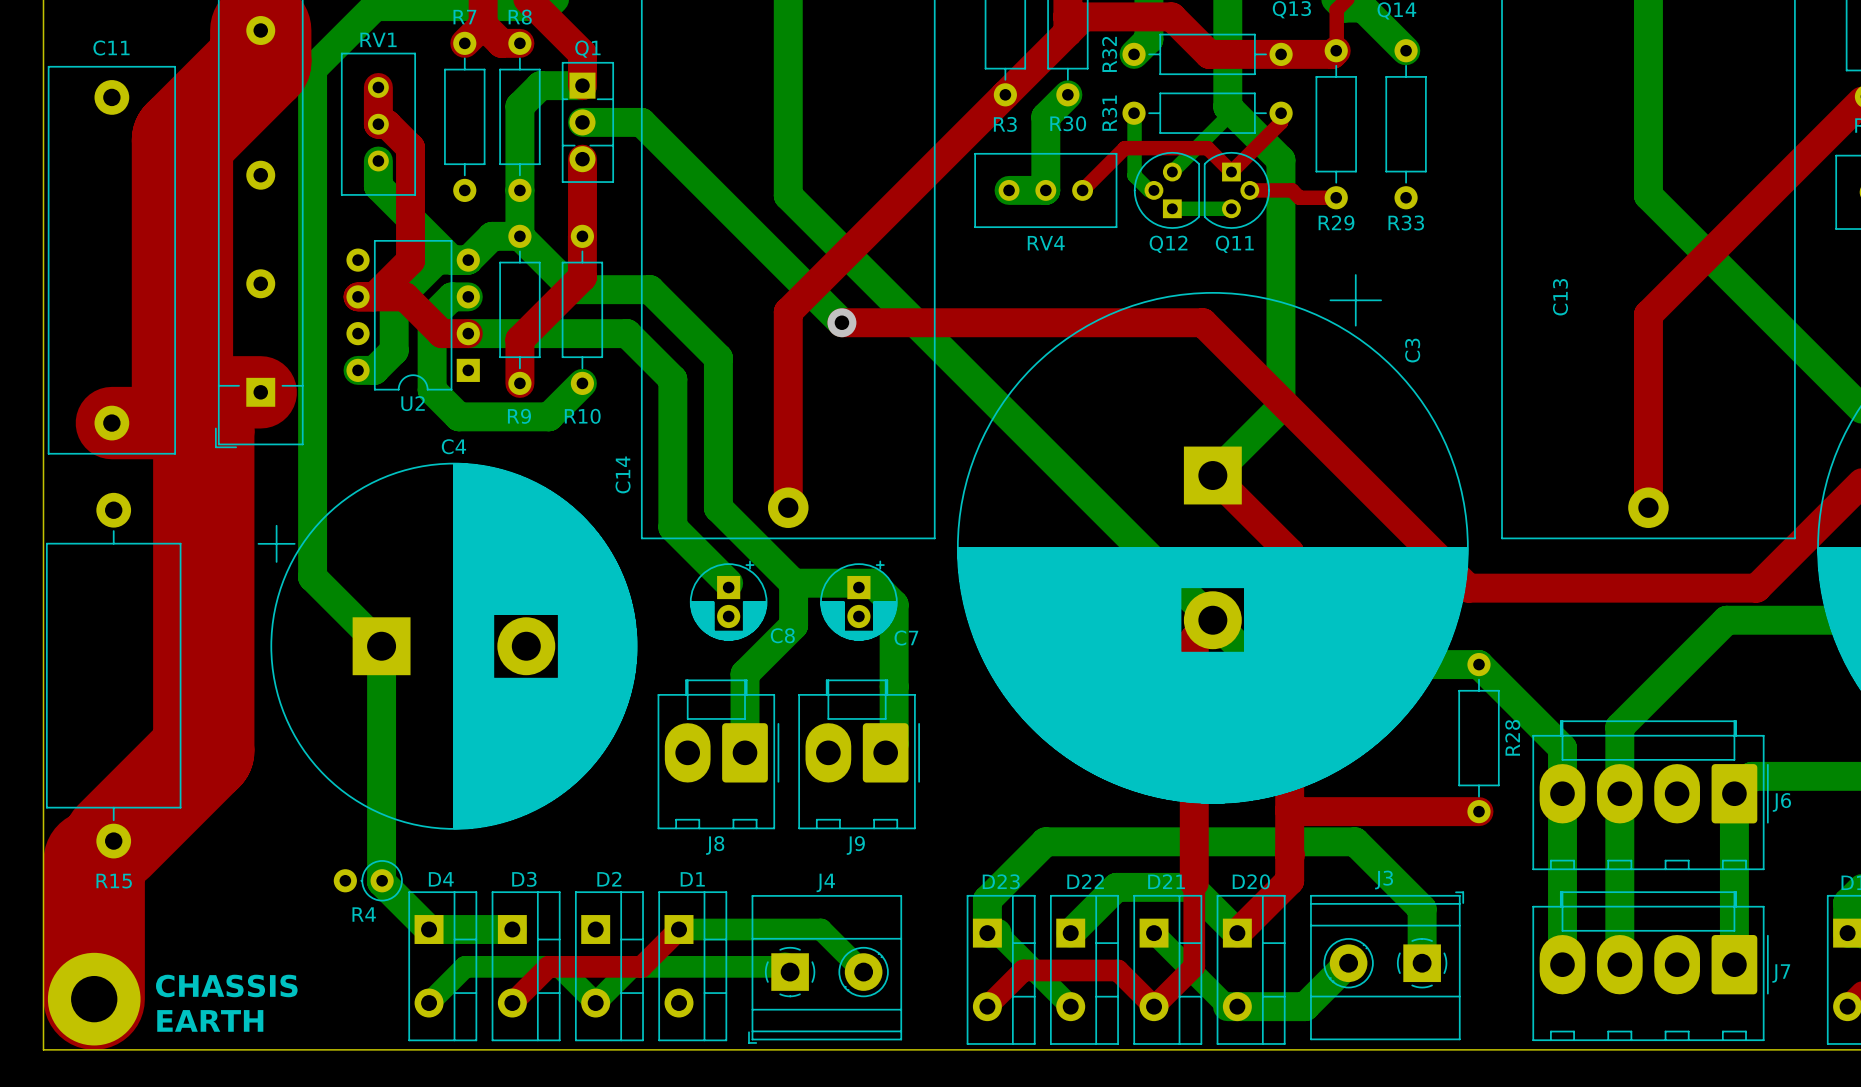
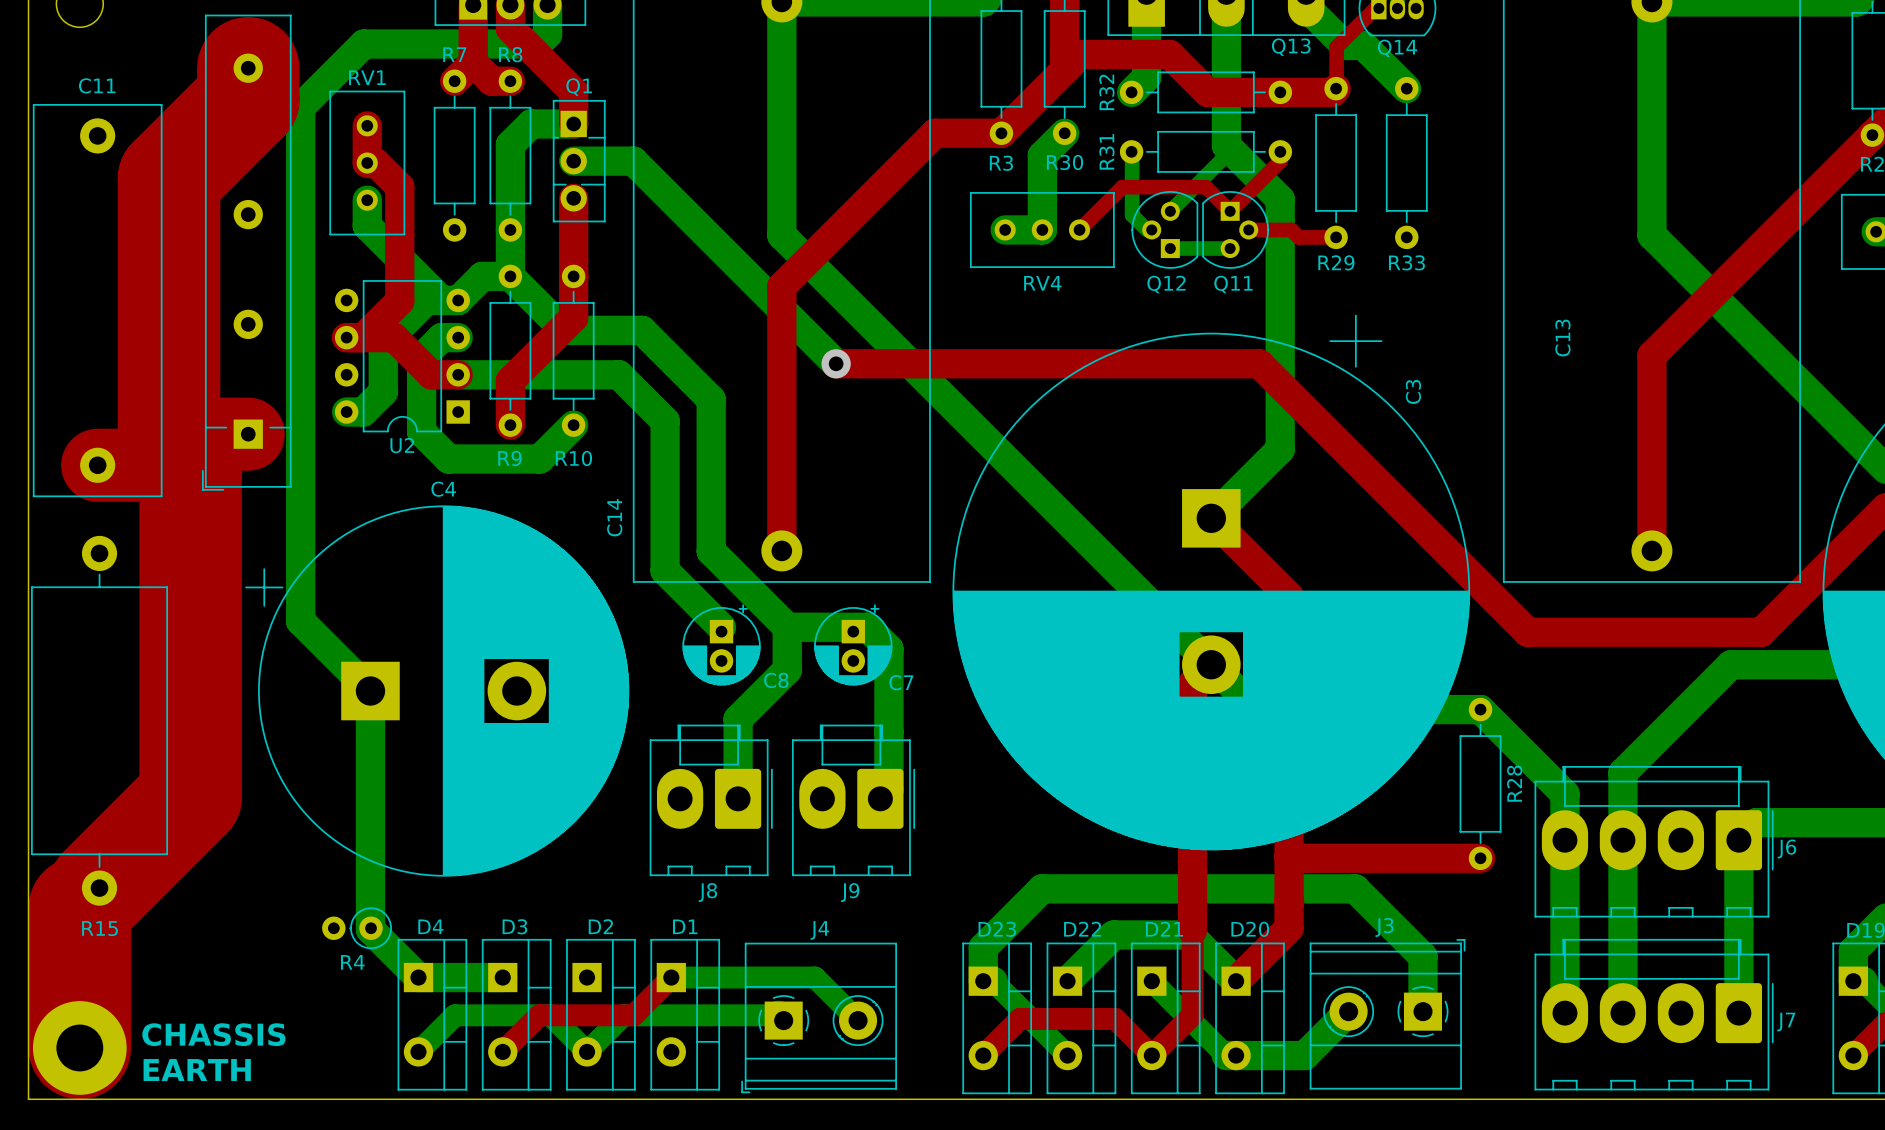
top track: (1005, 94) (788, 311) -> (1001, 133) (935, 133) (781, 286) (781, 352)
top track: (1202, 322) (1468, 588) (1525, 588) -> (1201, 363) (1259, 363) (1527, 632)

